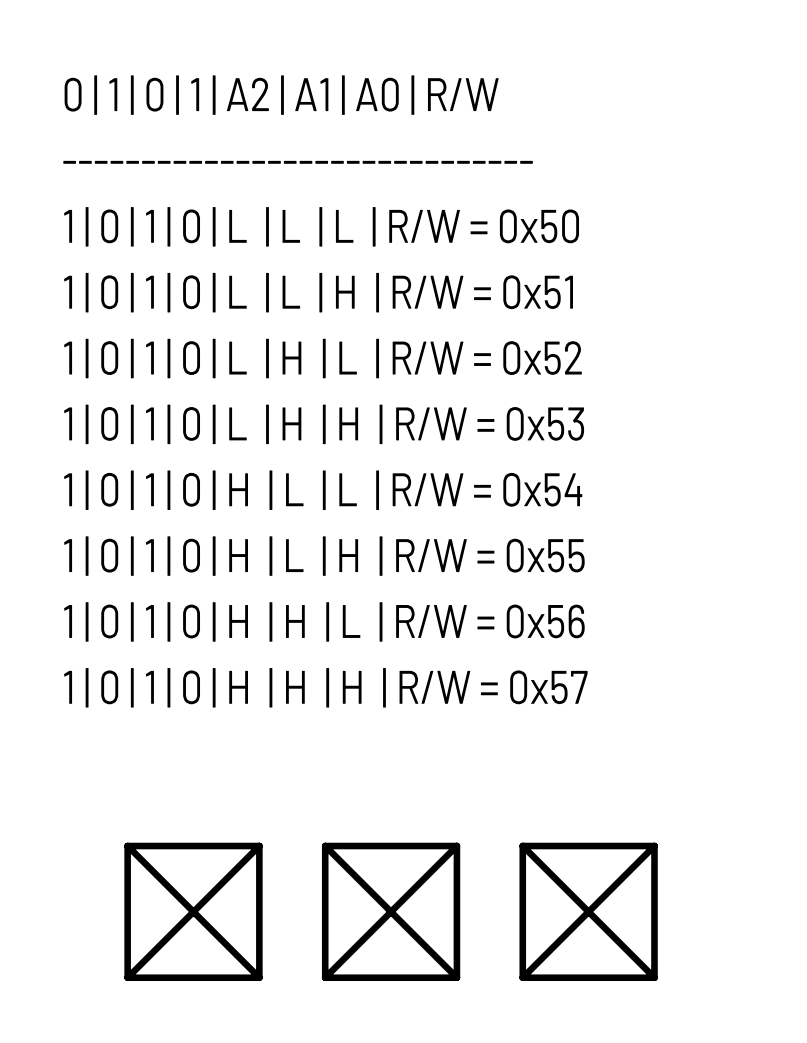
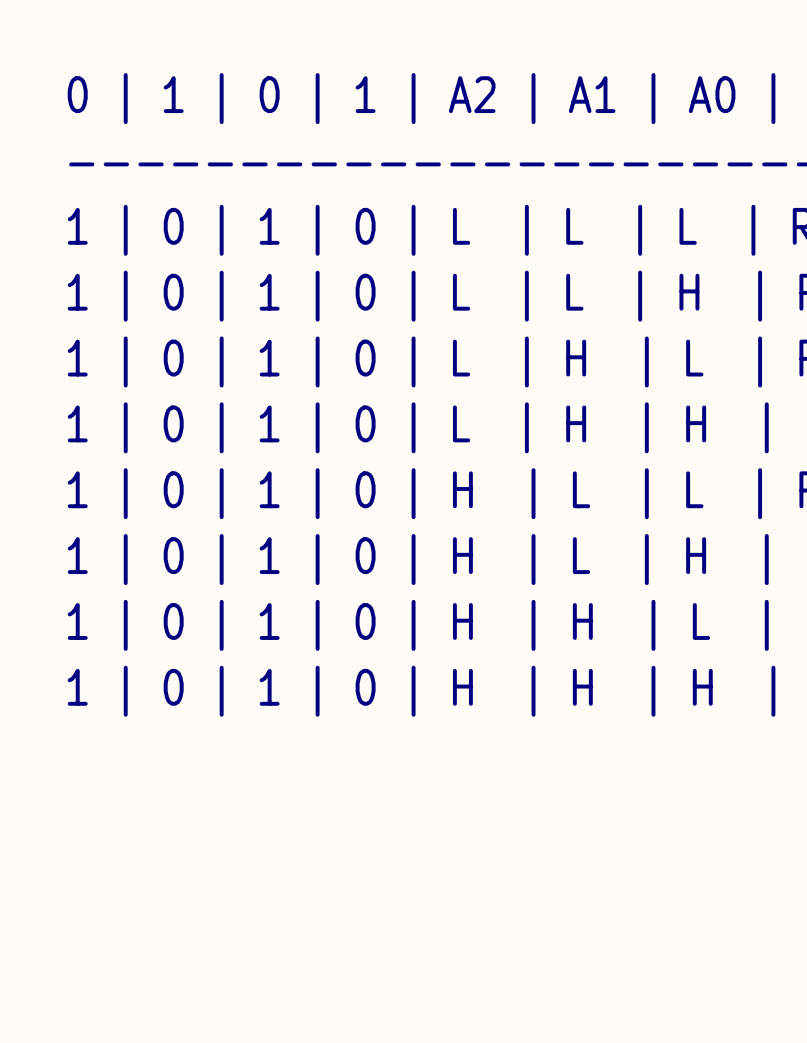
part: (193, 911) -> none
part: (391, 911) -> none
part: (588, 911) -> none

